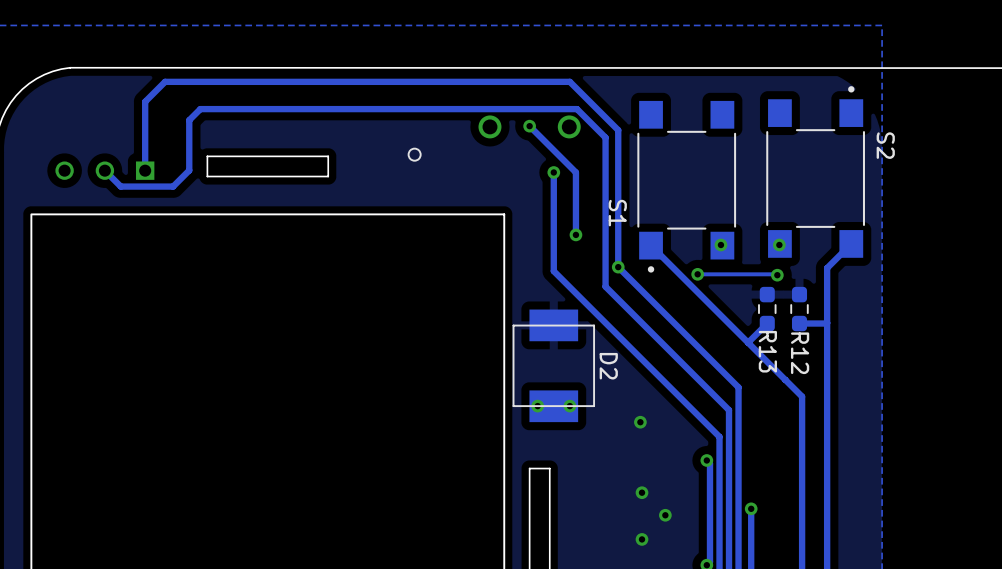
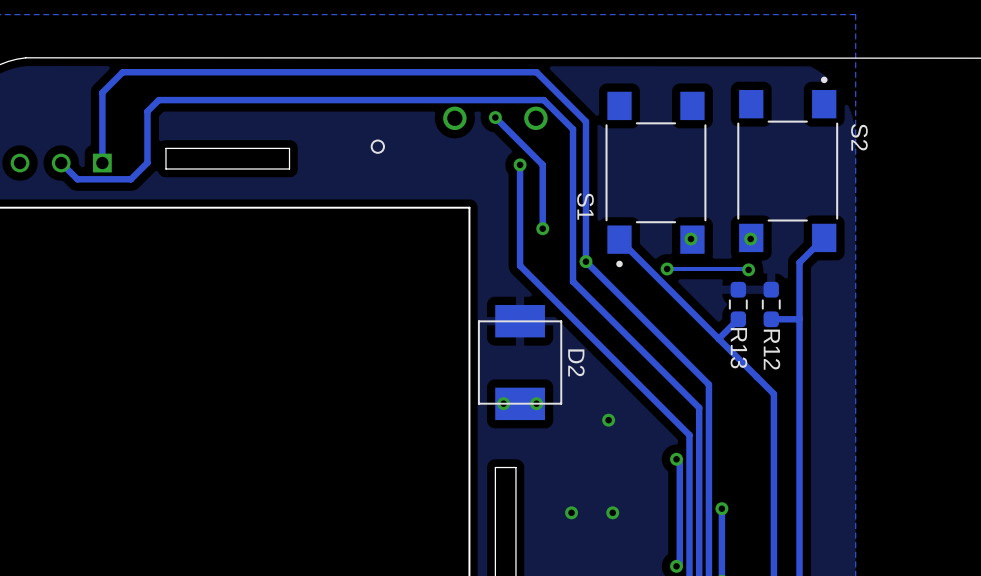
via: (642, 492) -> none
via: none -> (571, 512)
via: none -> (612, 512)
via: (665, 515) -> none
via: (642, 539) -> none

